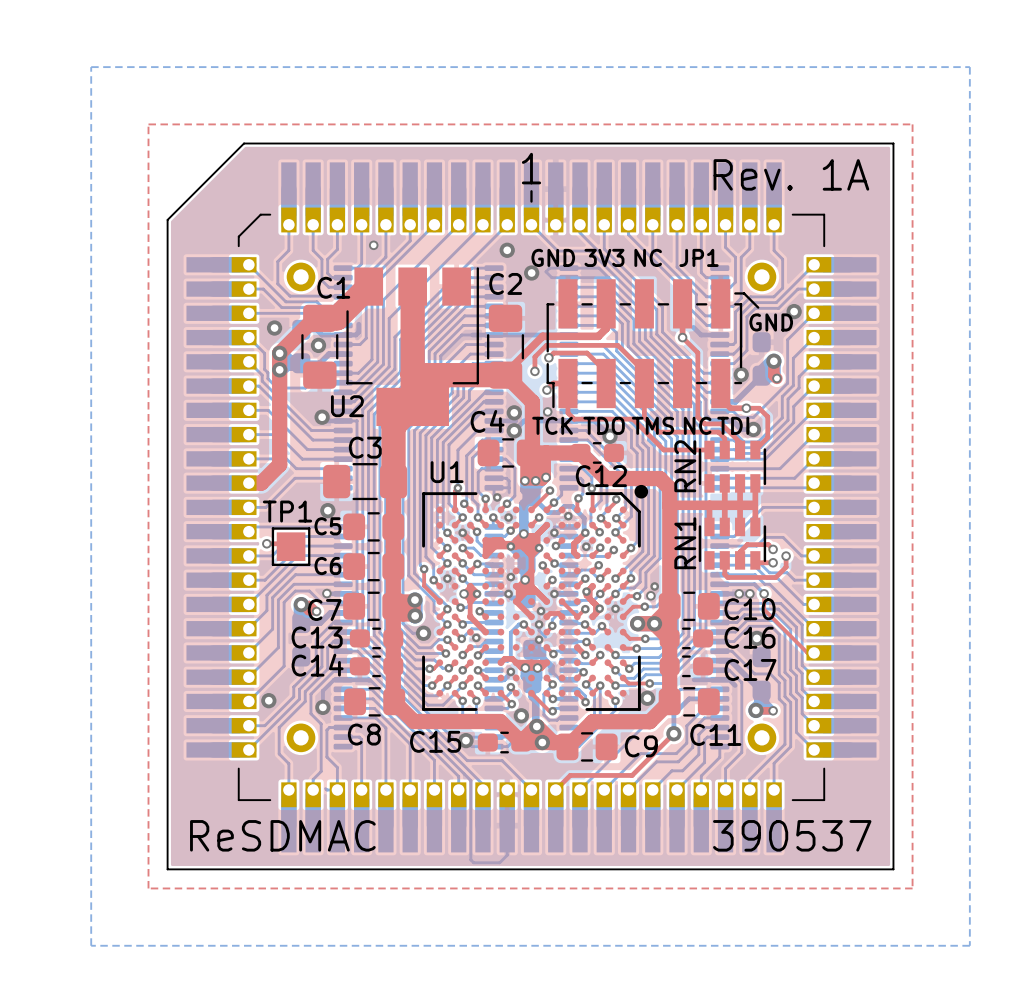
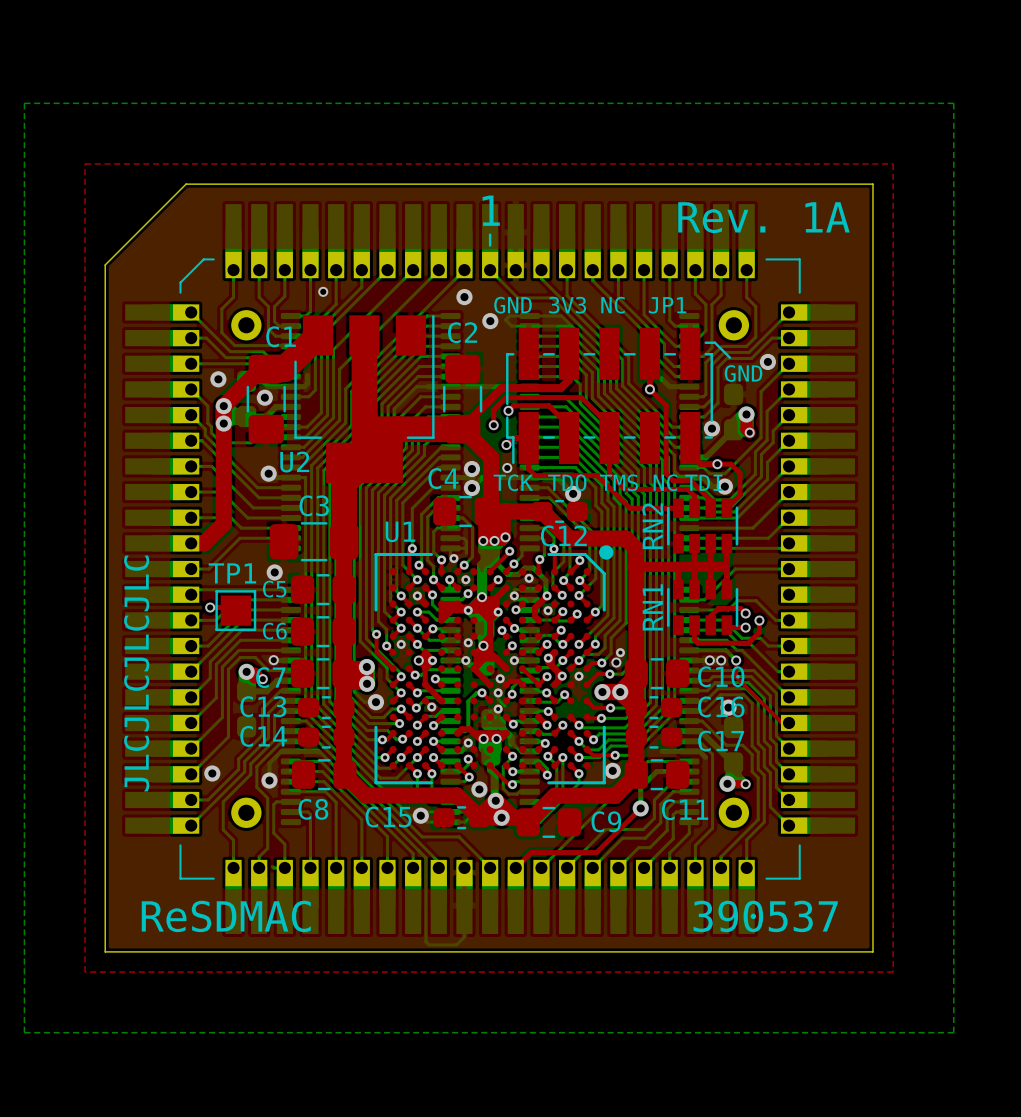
text: none -> JLCJLCJLCJLC (136, 673)

